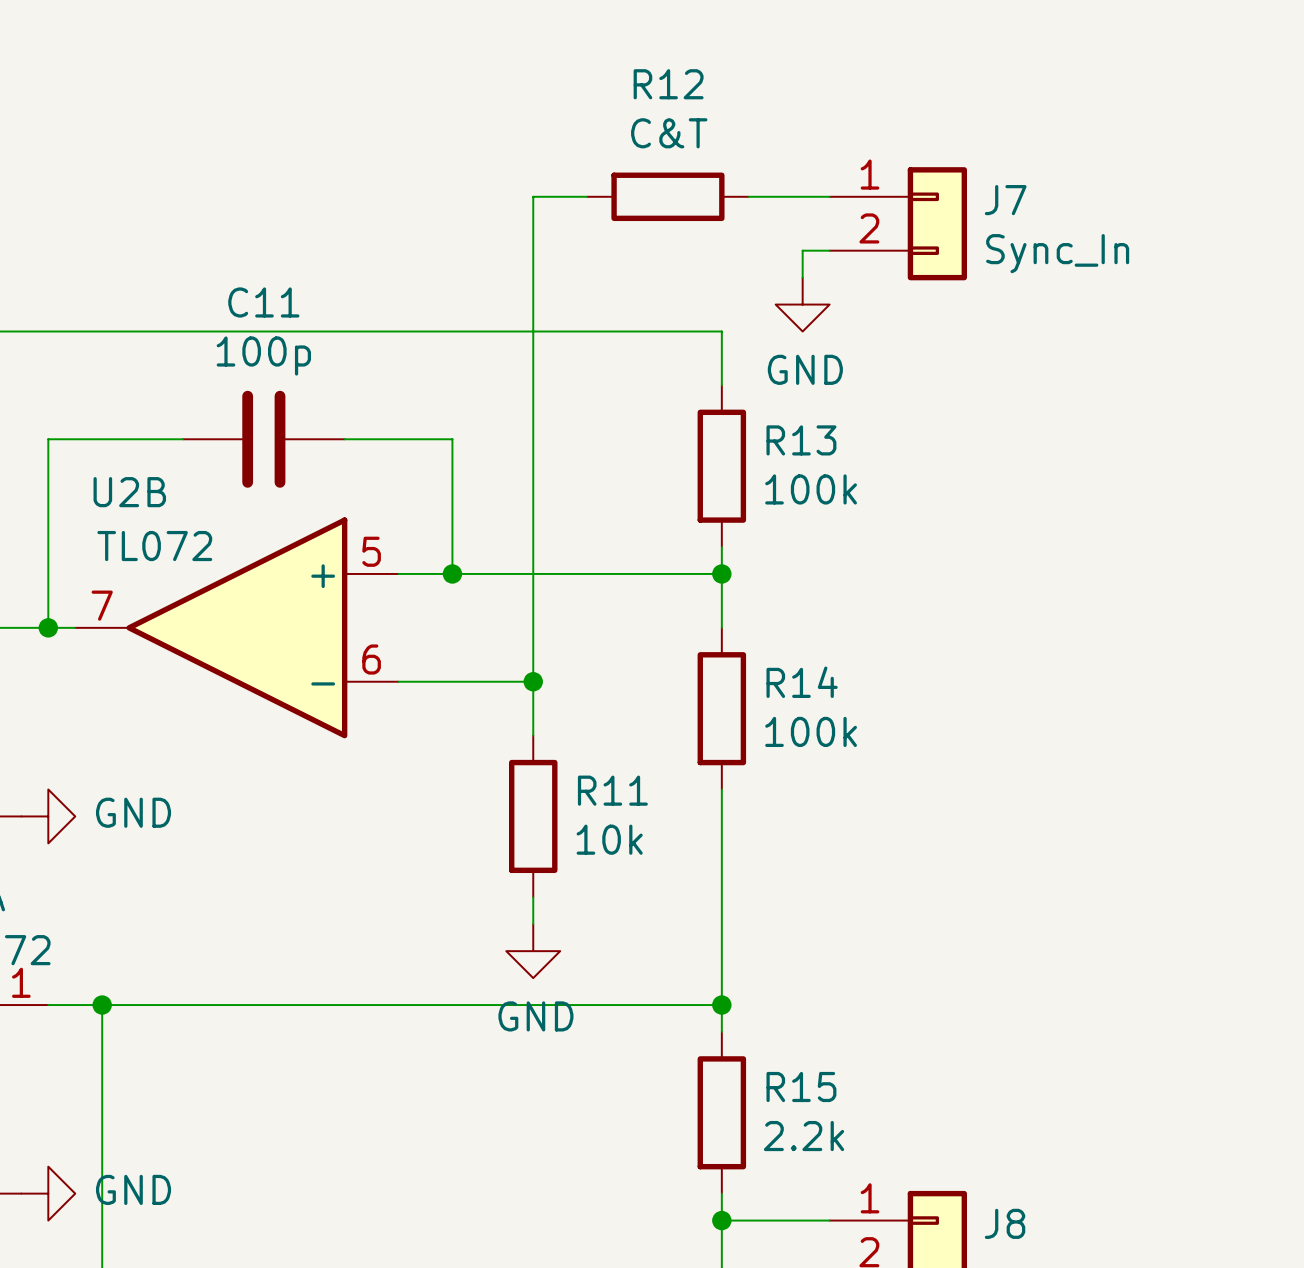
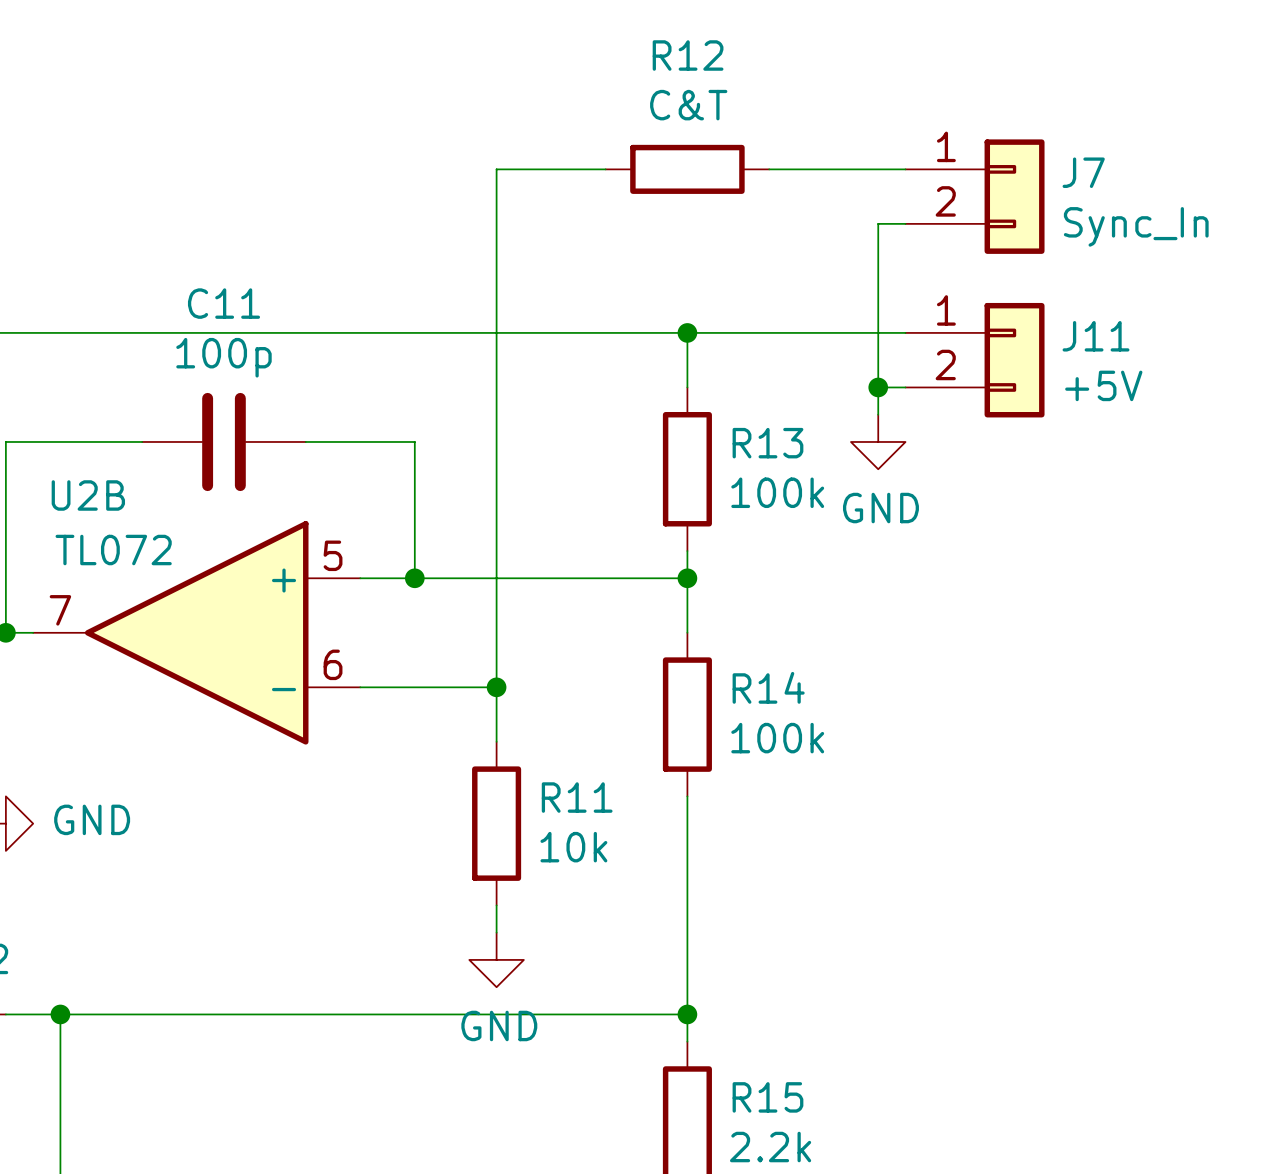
wire: none -> (769, 169) (905, 169)
wire: (533, 196) (587, 196) -> (496, 196) (496, 169) (605, 169)
R12 position: (667, 196) -> (687, 169)
wire: (748, 196) (829, 196) -> none
J7 position: (898, 223) -> (975, 196)
wire: none -> (905, 223) (878, 223) (878, 414)
wire: (829, 250) (802, 250) (802, 277) -> none
power symbol position: GND (802, 304) -> GND (878, 441)
wire: none -> (687, 332) (905, 332)
junction: none -> (687, 332)
J11: none -> +5V (975, 360)
wire: none -> (878, 387) (905, 387)
junction: none -> (878, 387)

